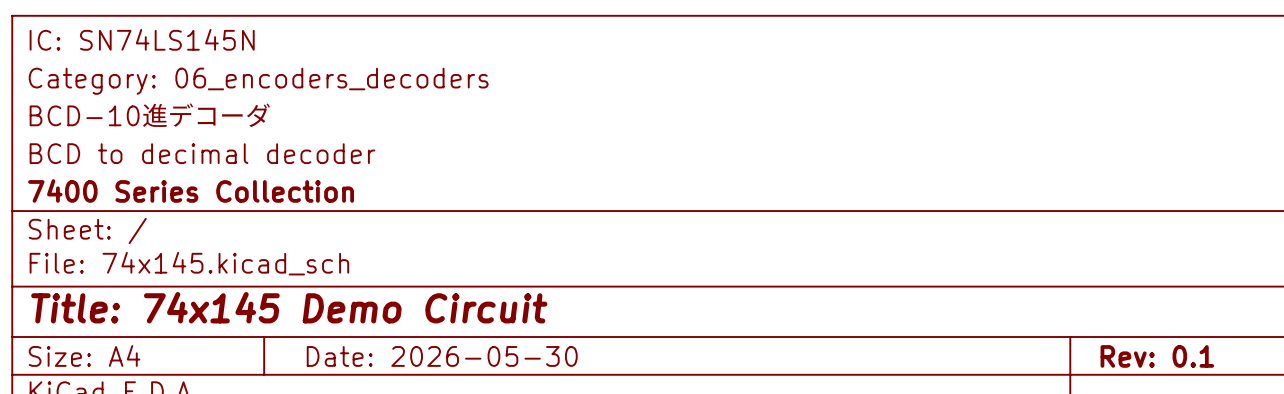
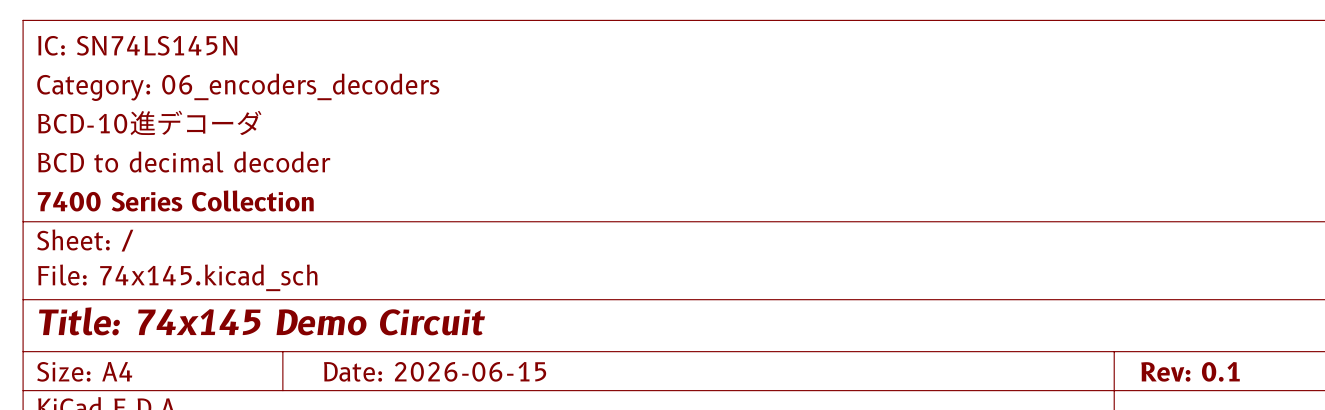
title block: Date: 2026-05-30 (442, 356) -> Date: 2026-06-15 (435, 371)

